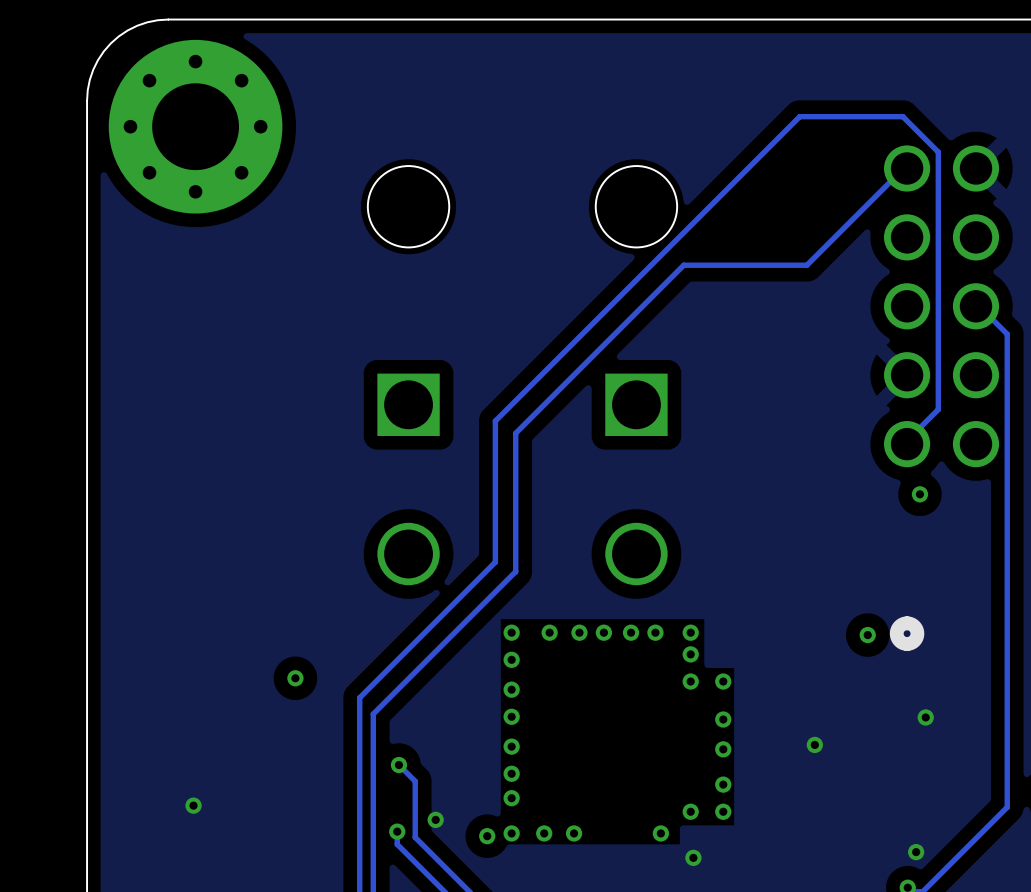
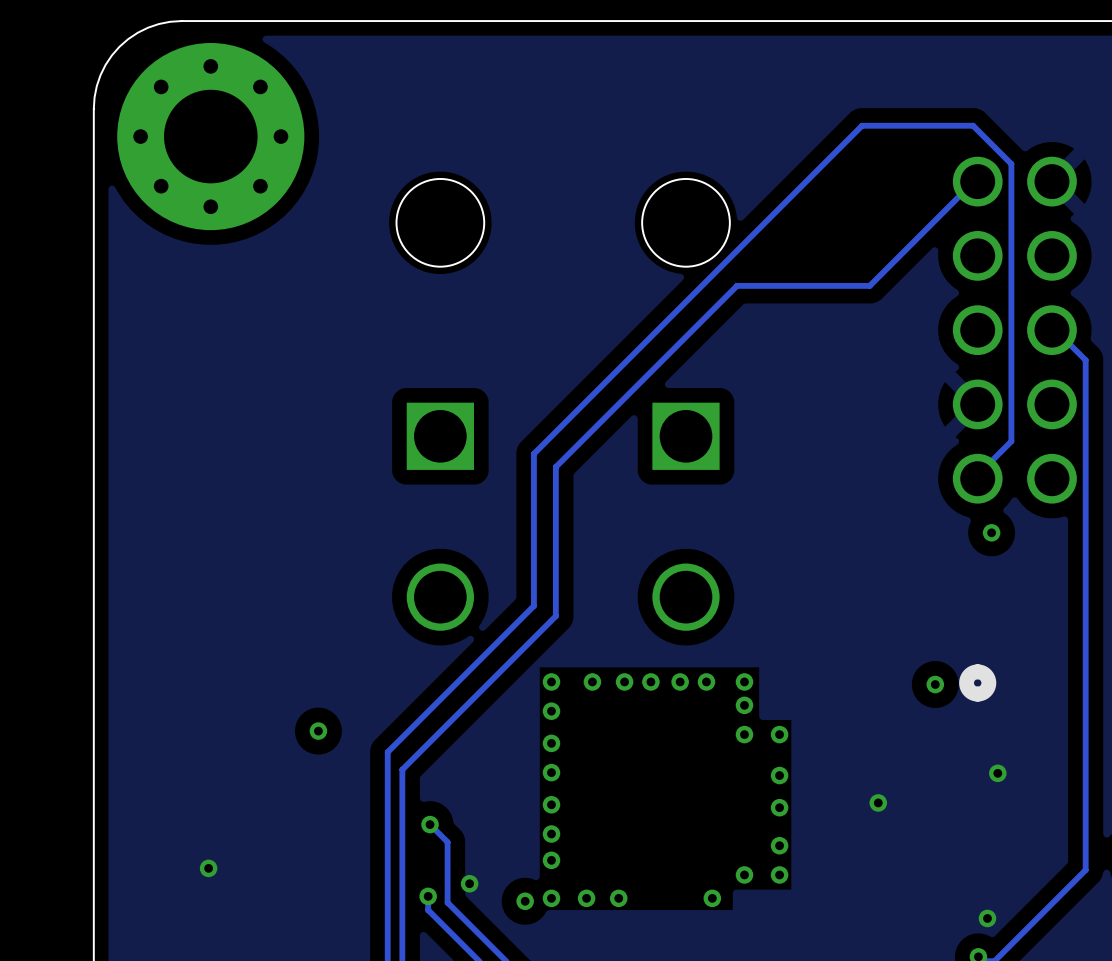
via: (693, 857) -> none

